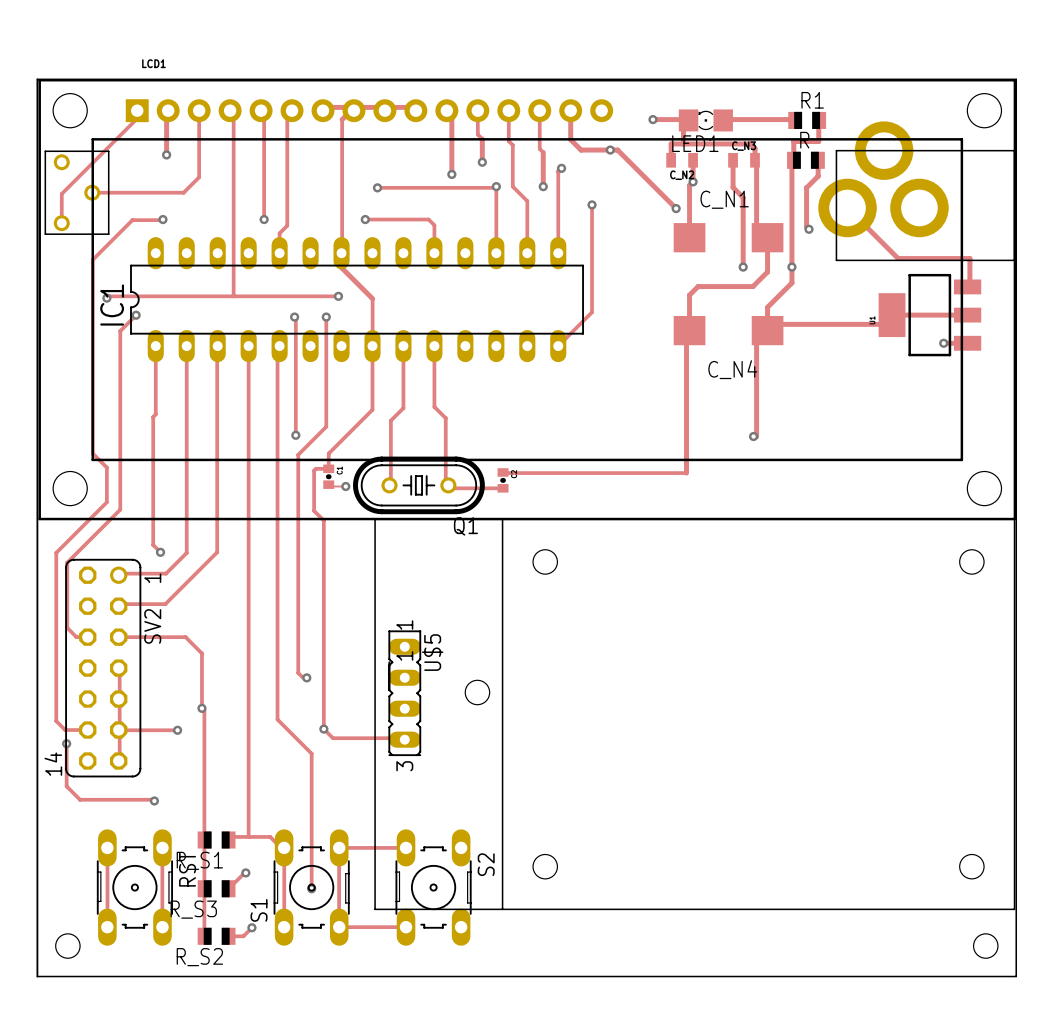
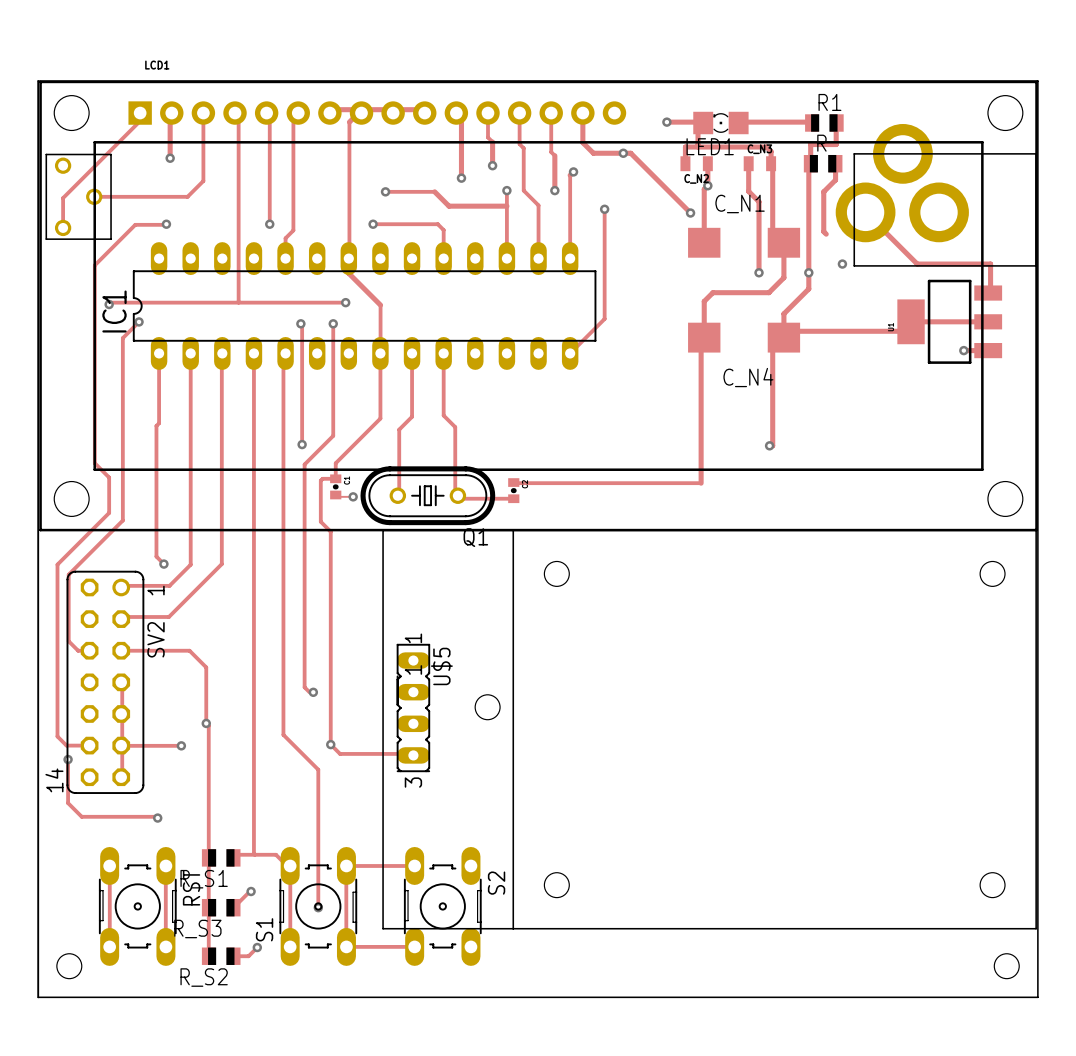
track: (425, 187) (495, 187) -> (434, 191) (449, 206) (506, 206)
via position: (809, 229) -> (842, 264)

